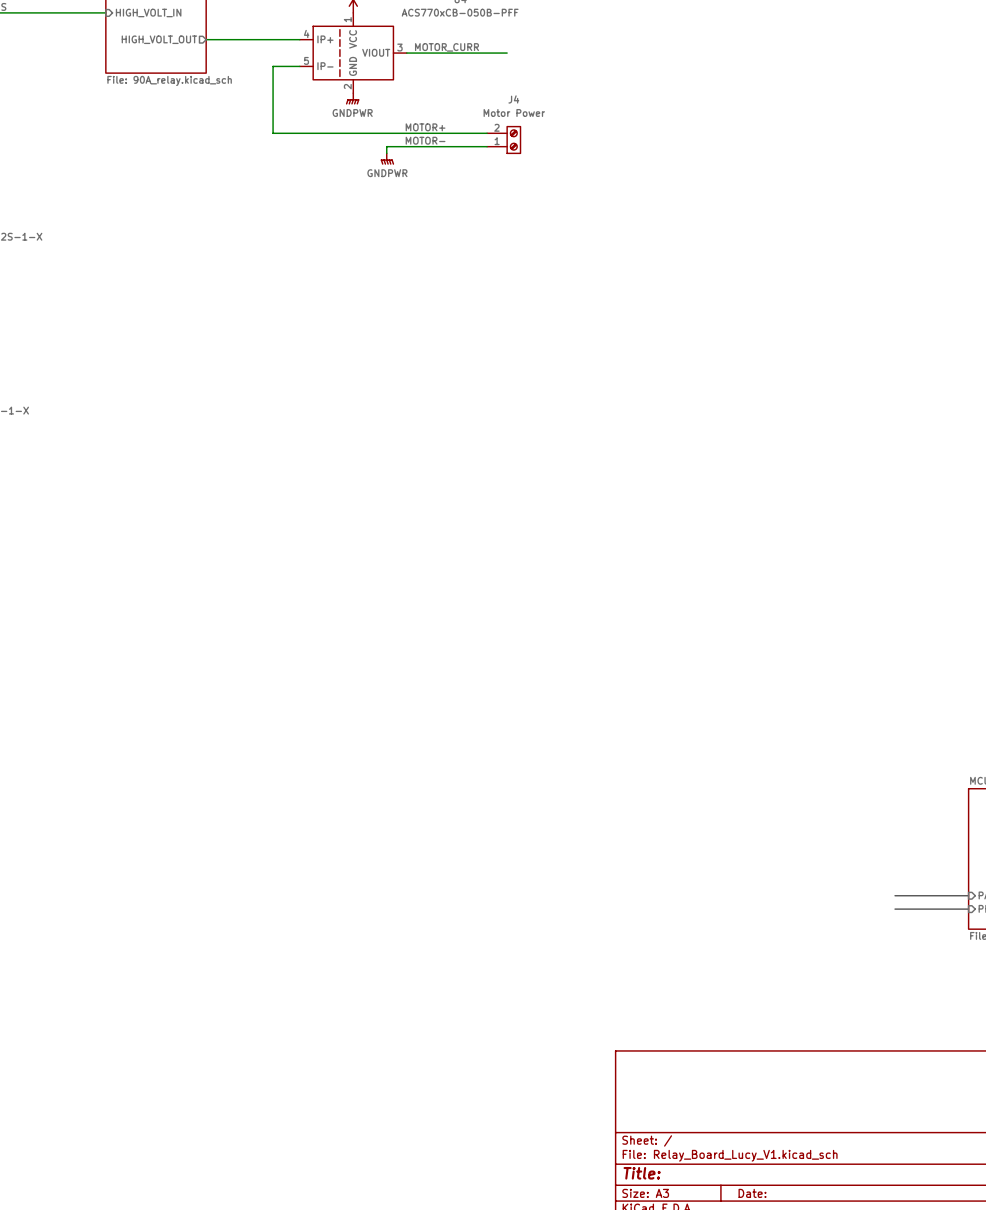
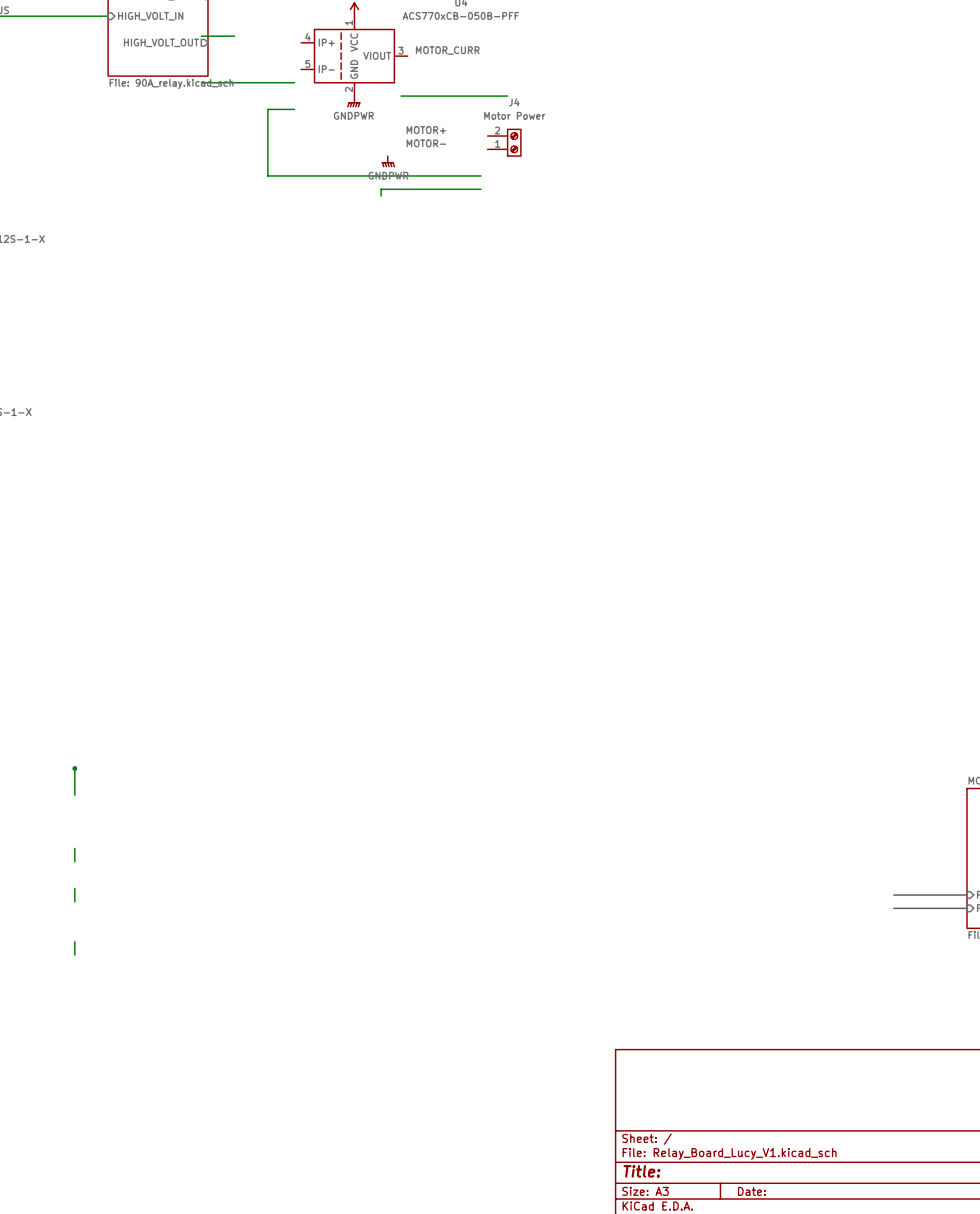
wire: none -> (201, 36) (234, 36)
wire: (206, 39) (299, 39) -> (201, 82) (294, 82)
wire: (406, 53) (507, 53) -> none
wire: (299, 66) (273, 66) (273, 133) (487, 133) -> (294, 109) (267, 109) (267, 175) (480, 175)
wire: none -> (401, 96) (507, 96)
wire: (487, 146) (386, 146) (386, 153) -> (480, 189) (381, 189) (381, 195)
wire: none -> (74, 768) (74, 795)
junction: none -> (74, 768)
wire: none -> (74, 848) (74, 861)
wire: none -> (74, 888) (74, 901)
wire: none -> (74, 941) (74, 954)

